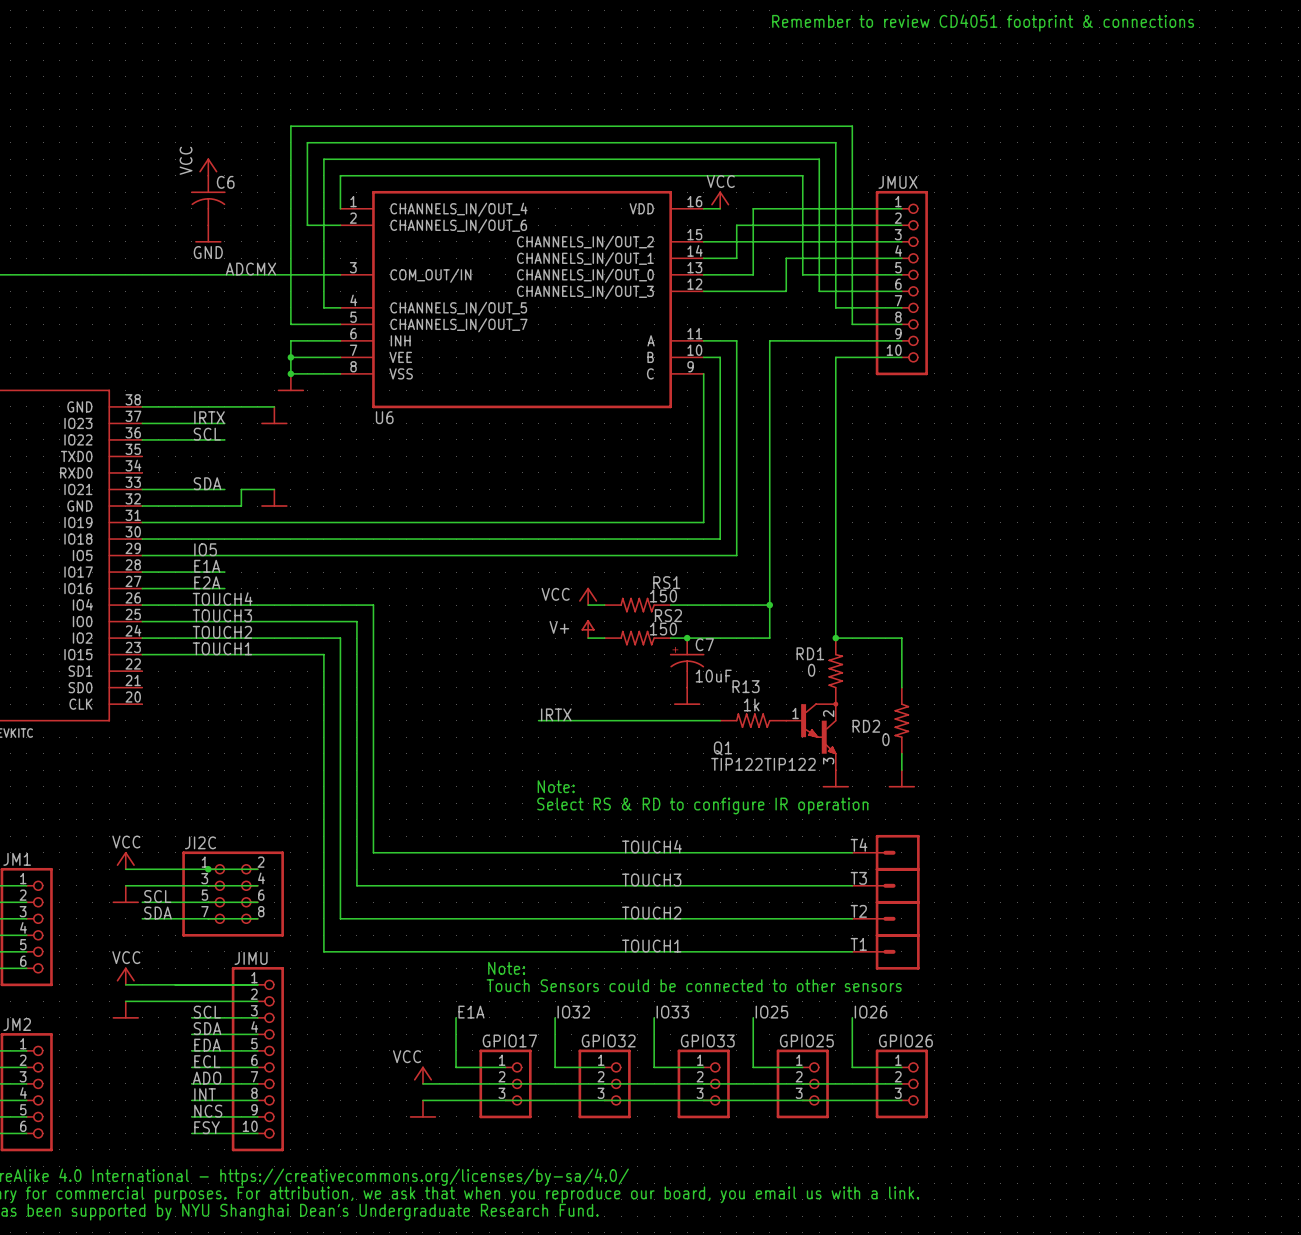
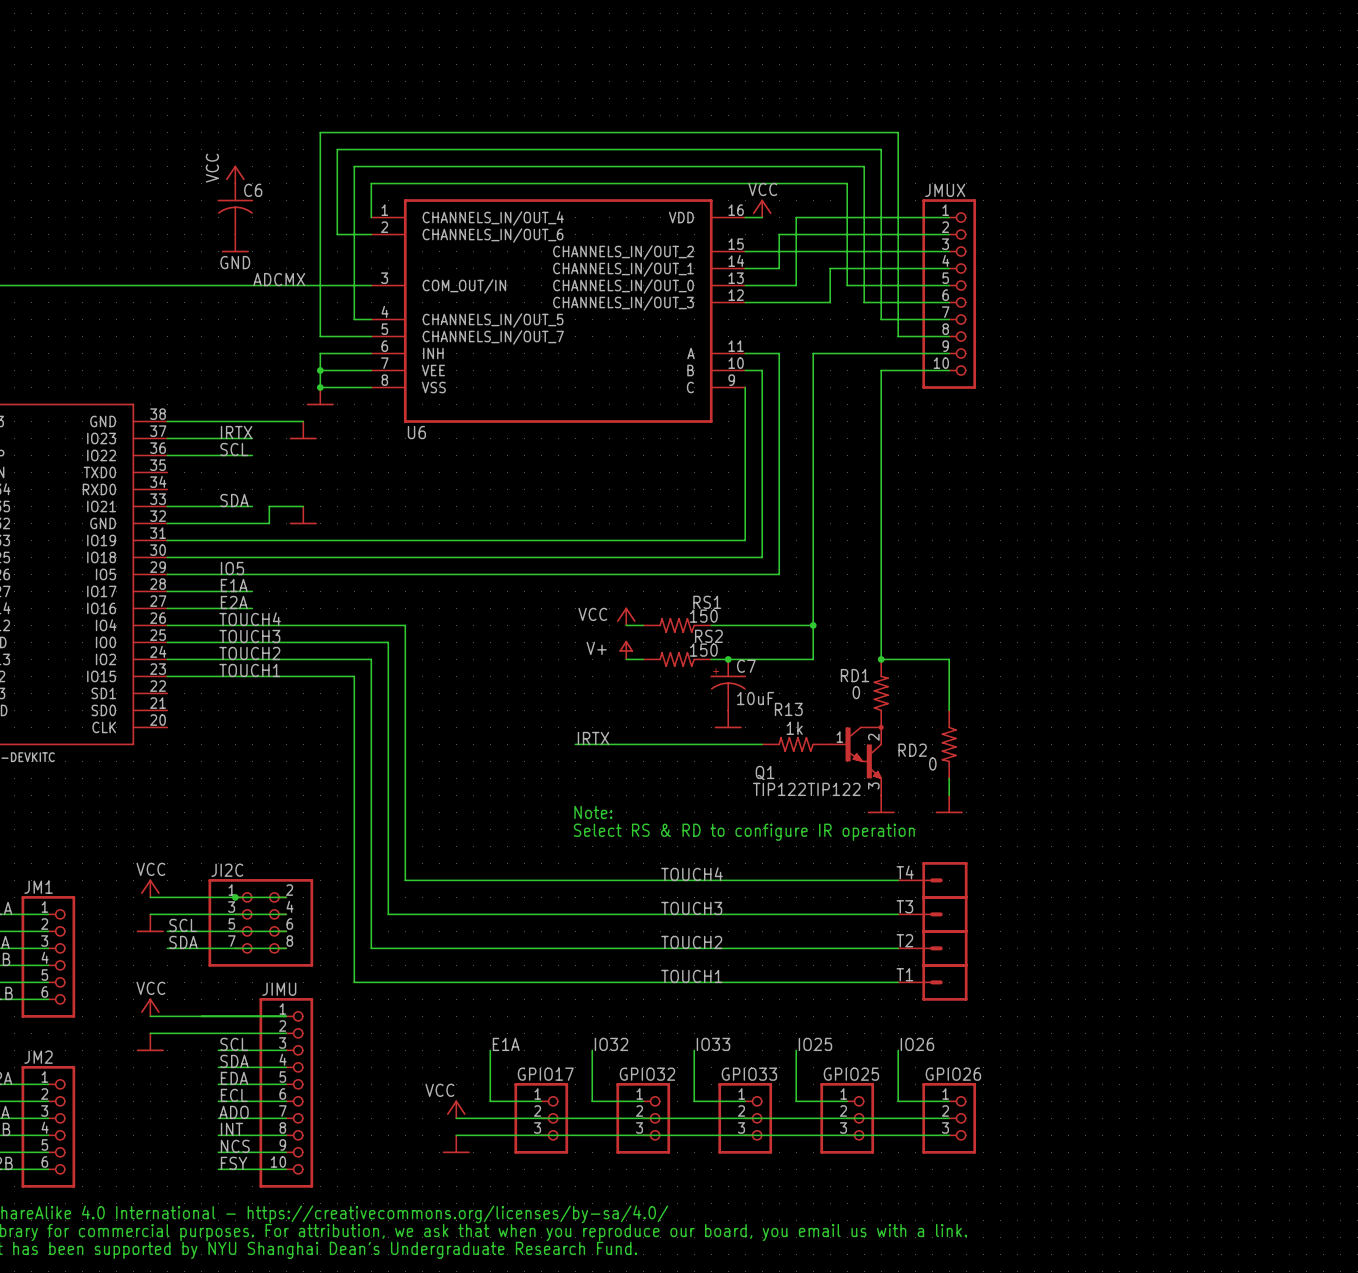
text: Remember to review CD4051 footprint & connections (983, 23) -> none
text: Note: (506, 968) -> none
text: Touch Sensors could be connected to other sensors (694, 985) -> none

